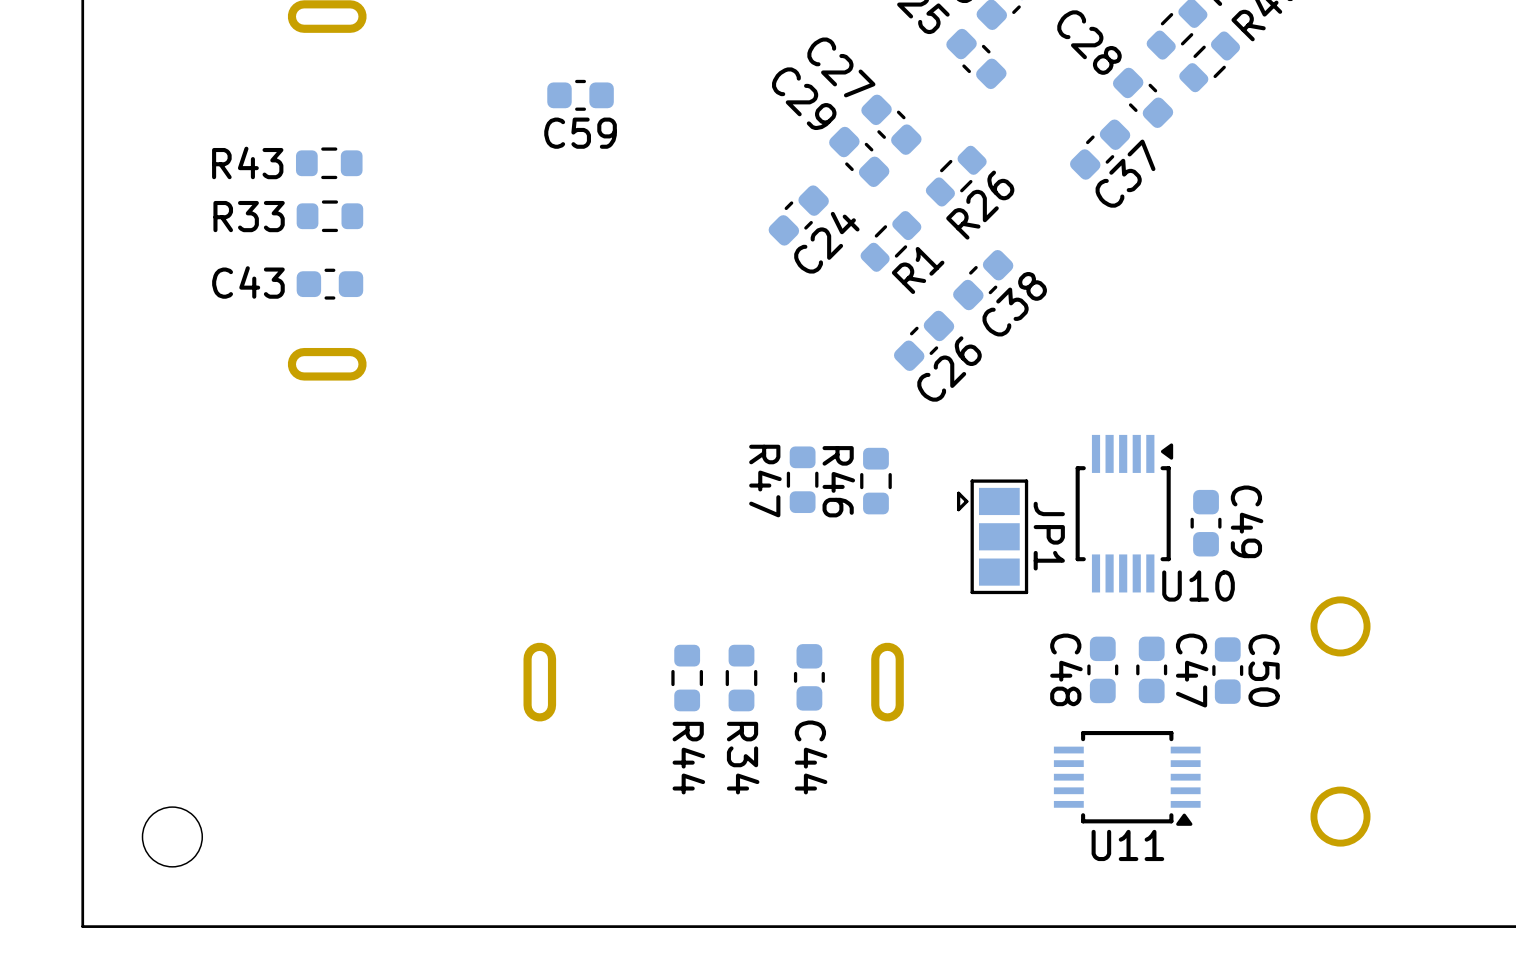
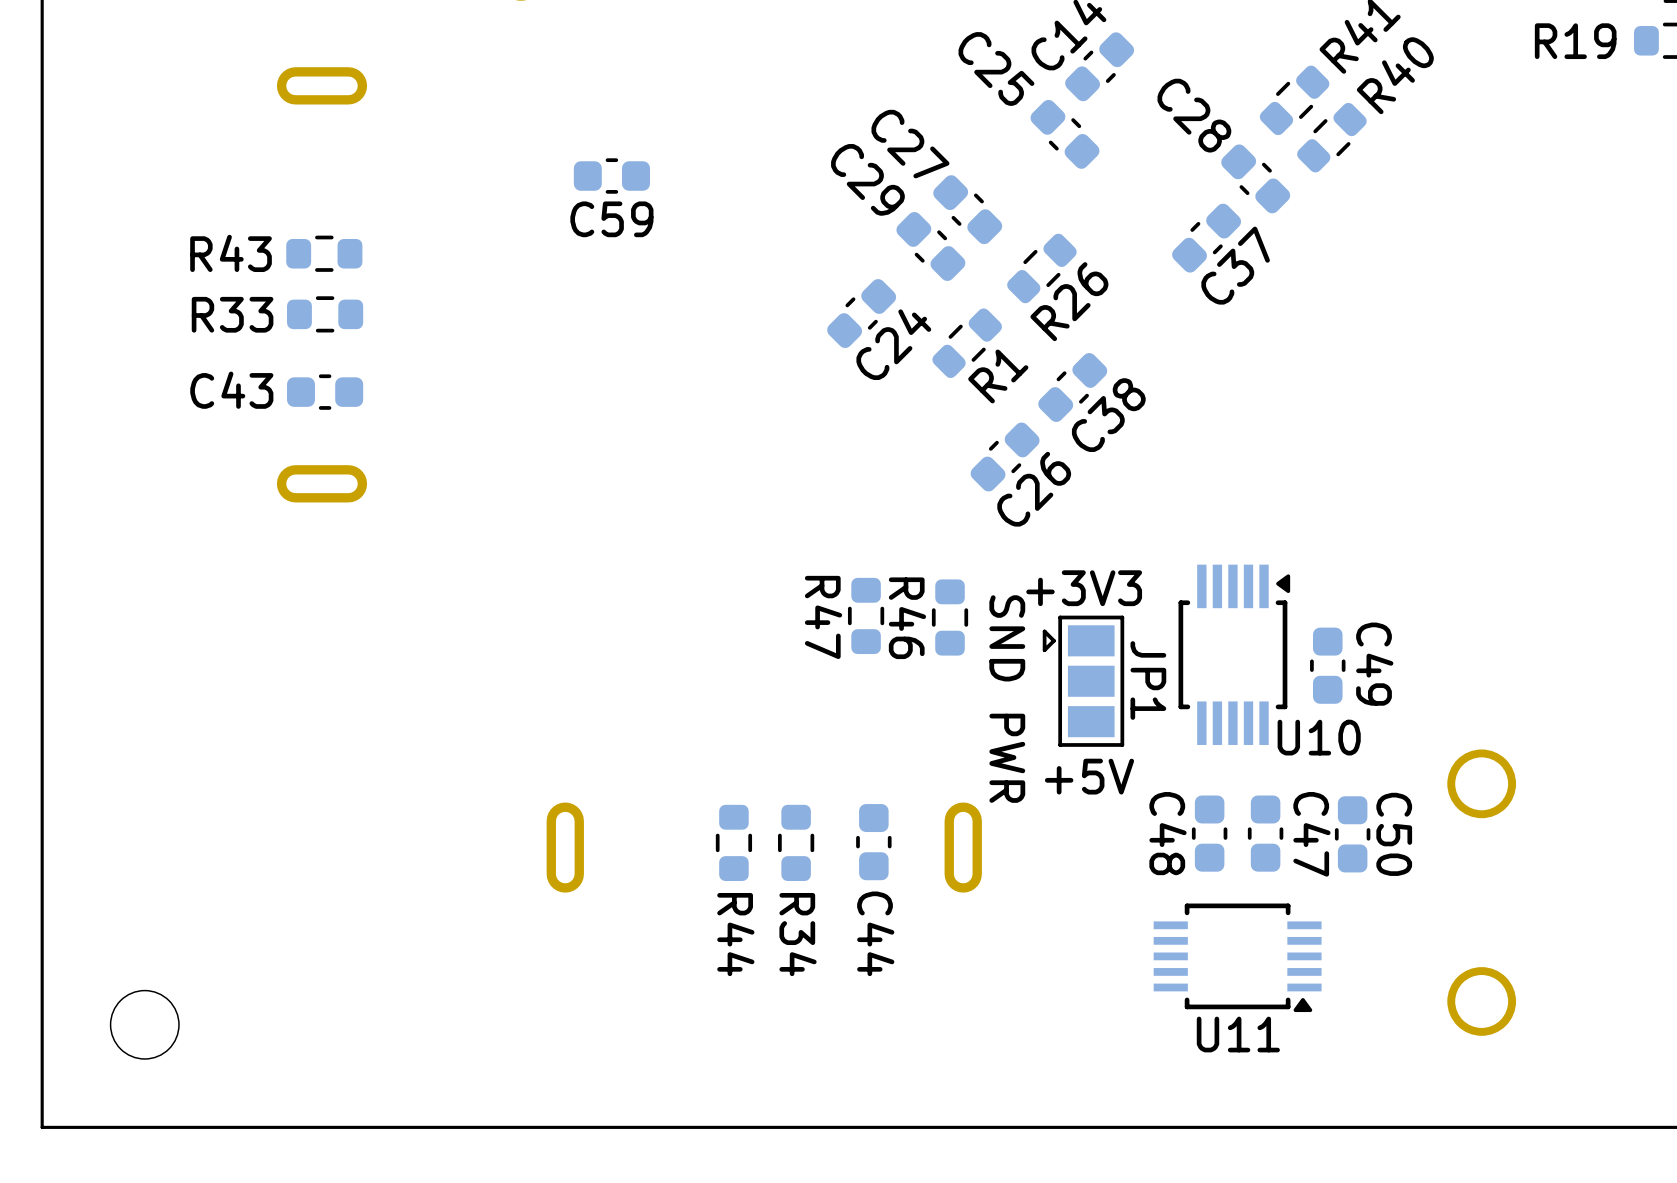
text: none -> +3V3 (1084, 588)
text: none -> SND PWR (1007, 699)
text: none -> +5V (1089, 776)

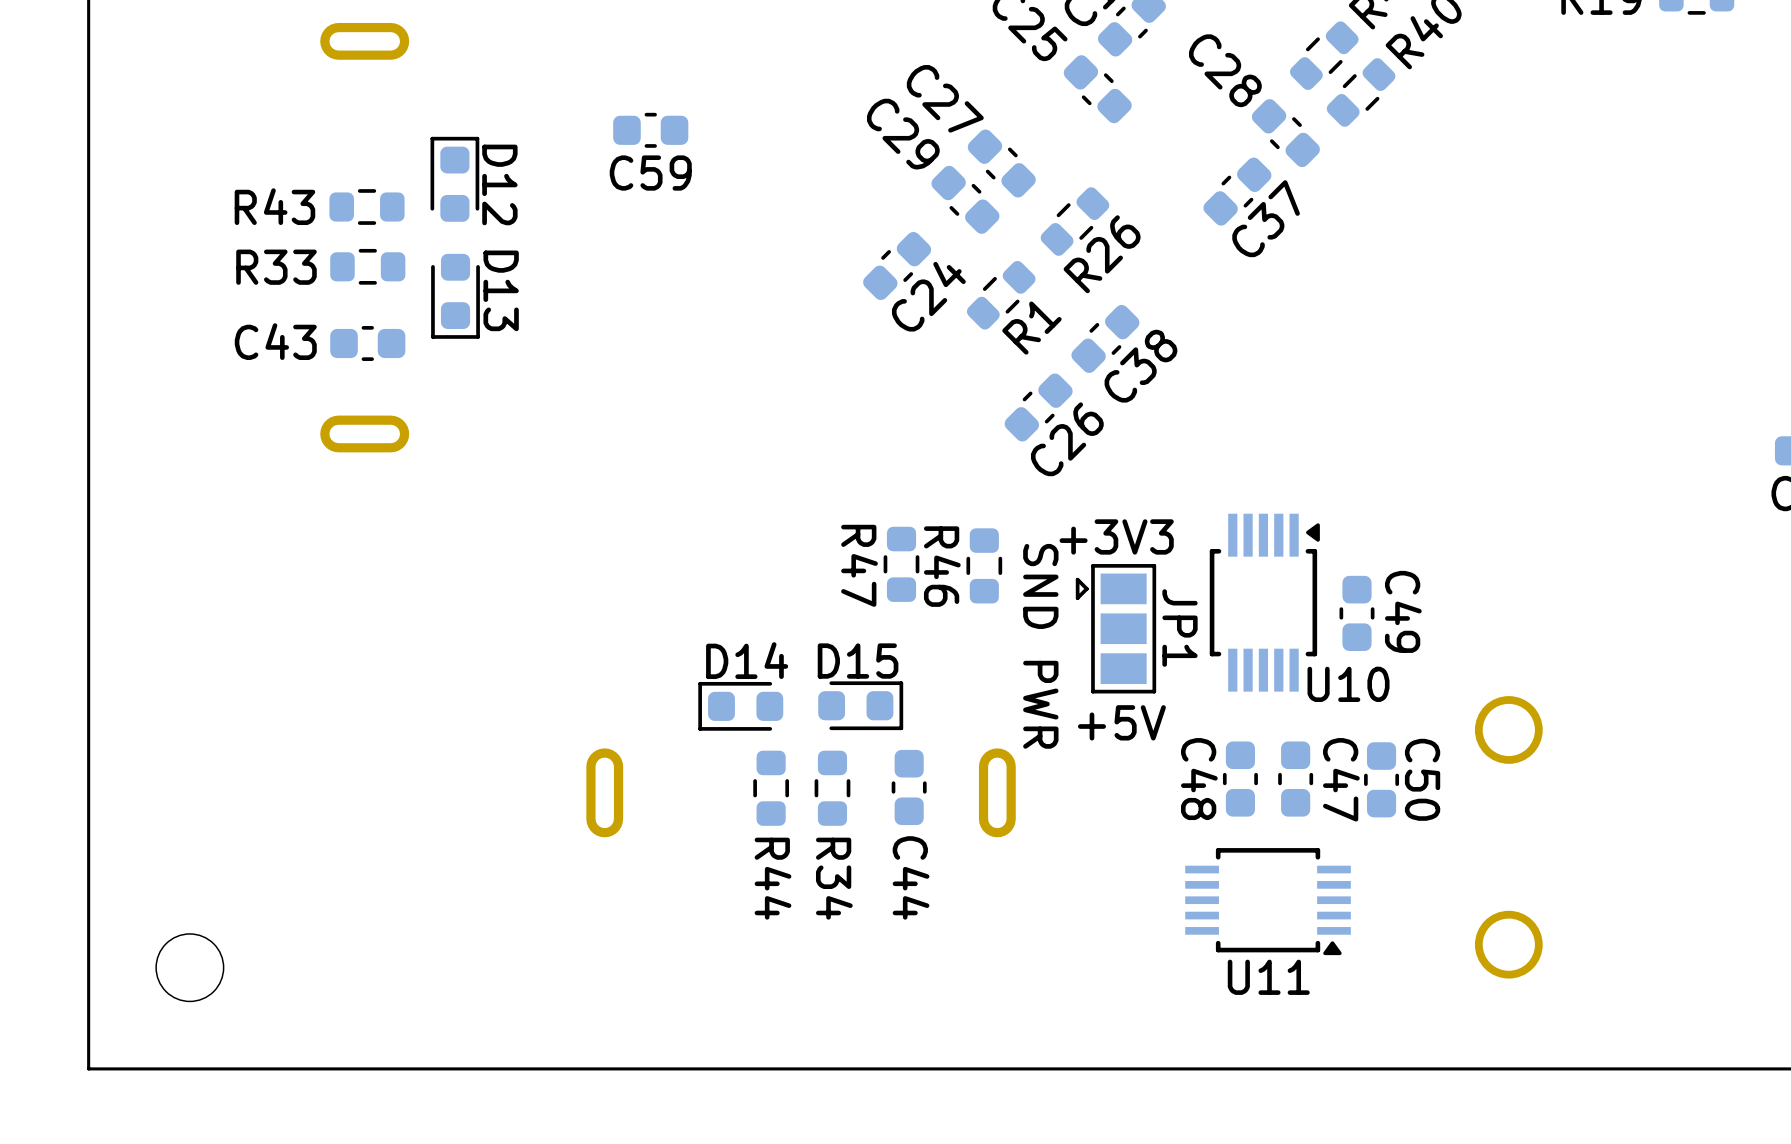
D12: none -> (454, 179)
D13: none -> (455, 296)
D14: none -> (740, 706)
D15: none -> (860, 705)

